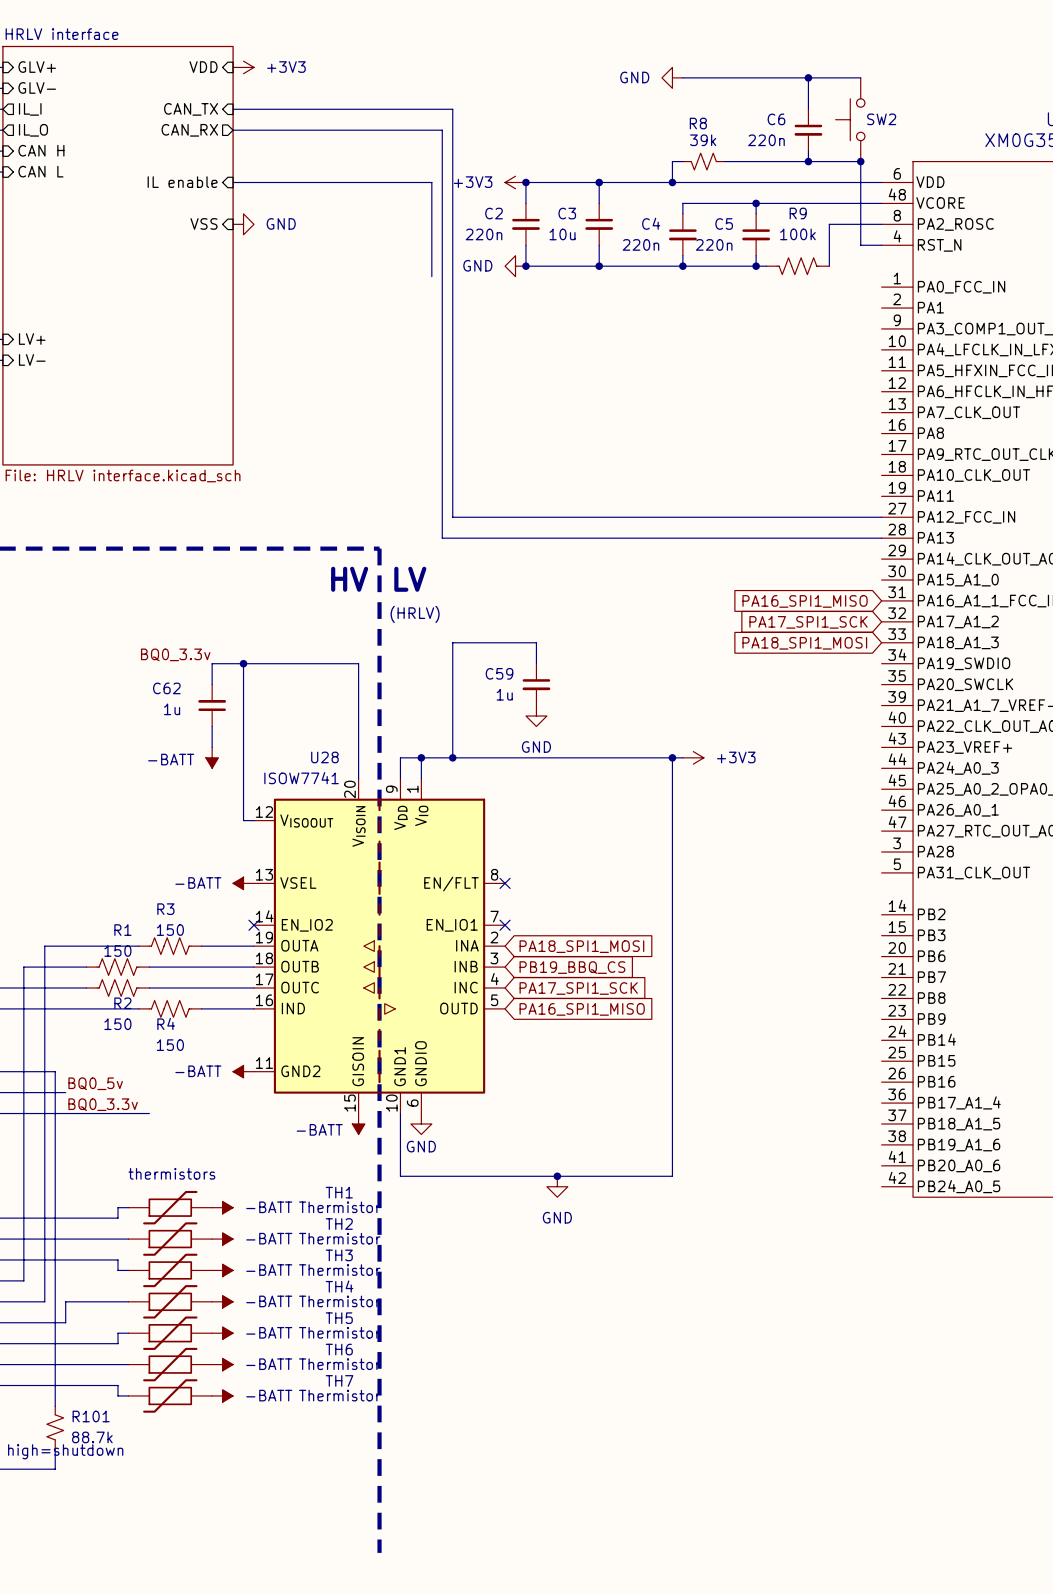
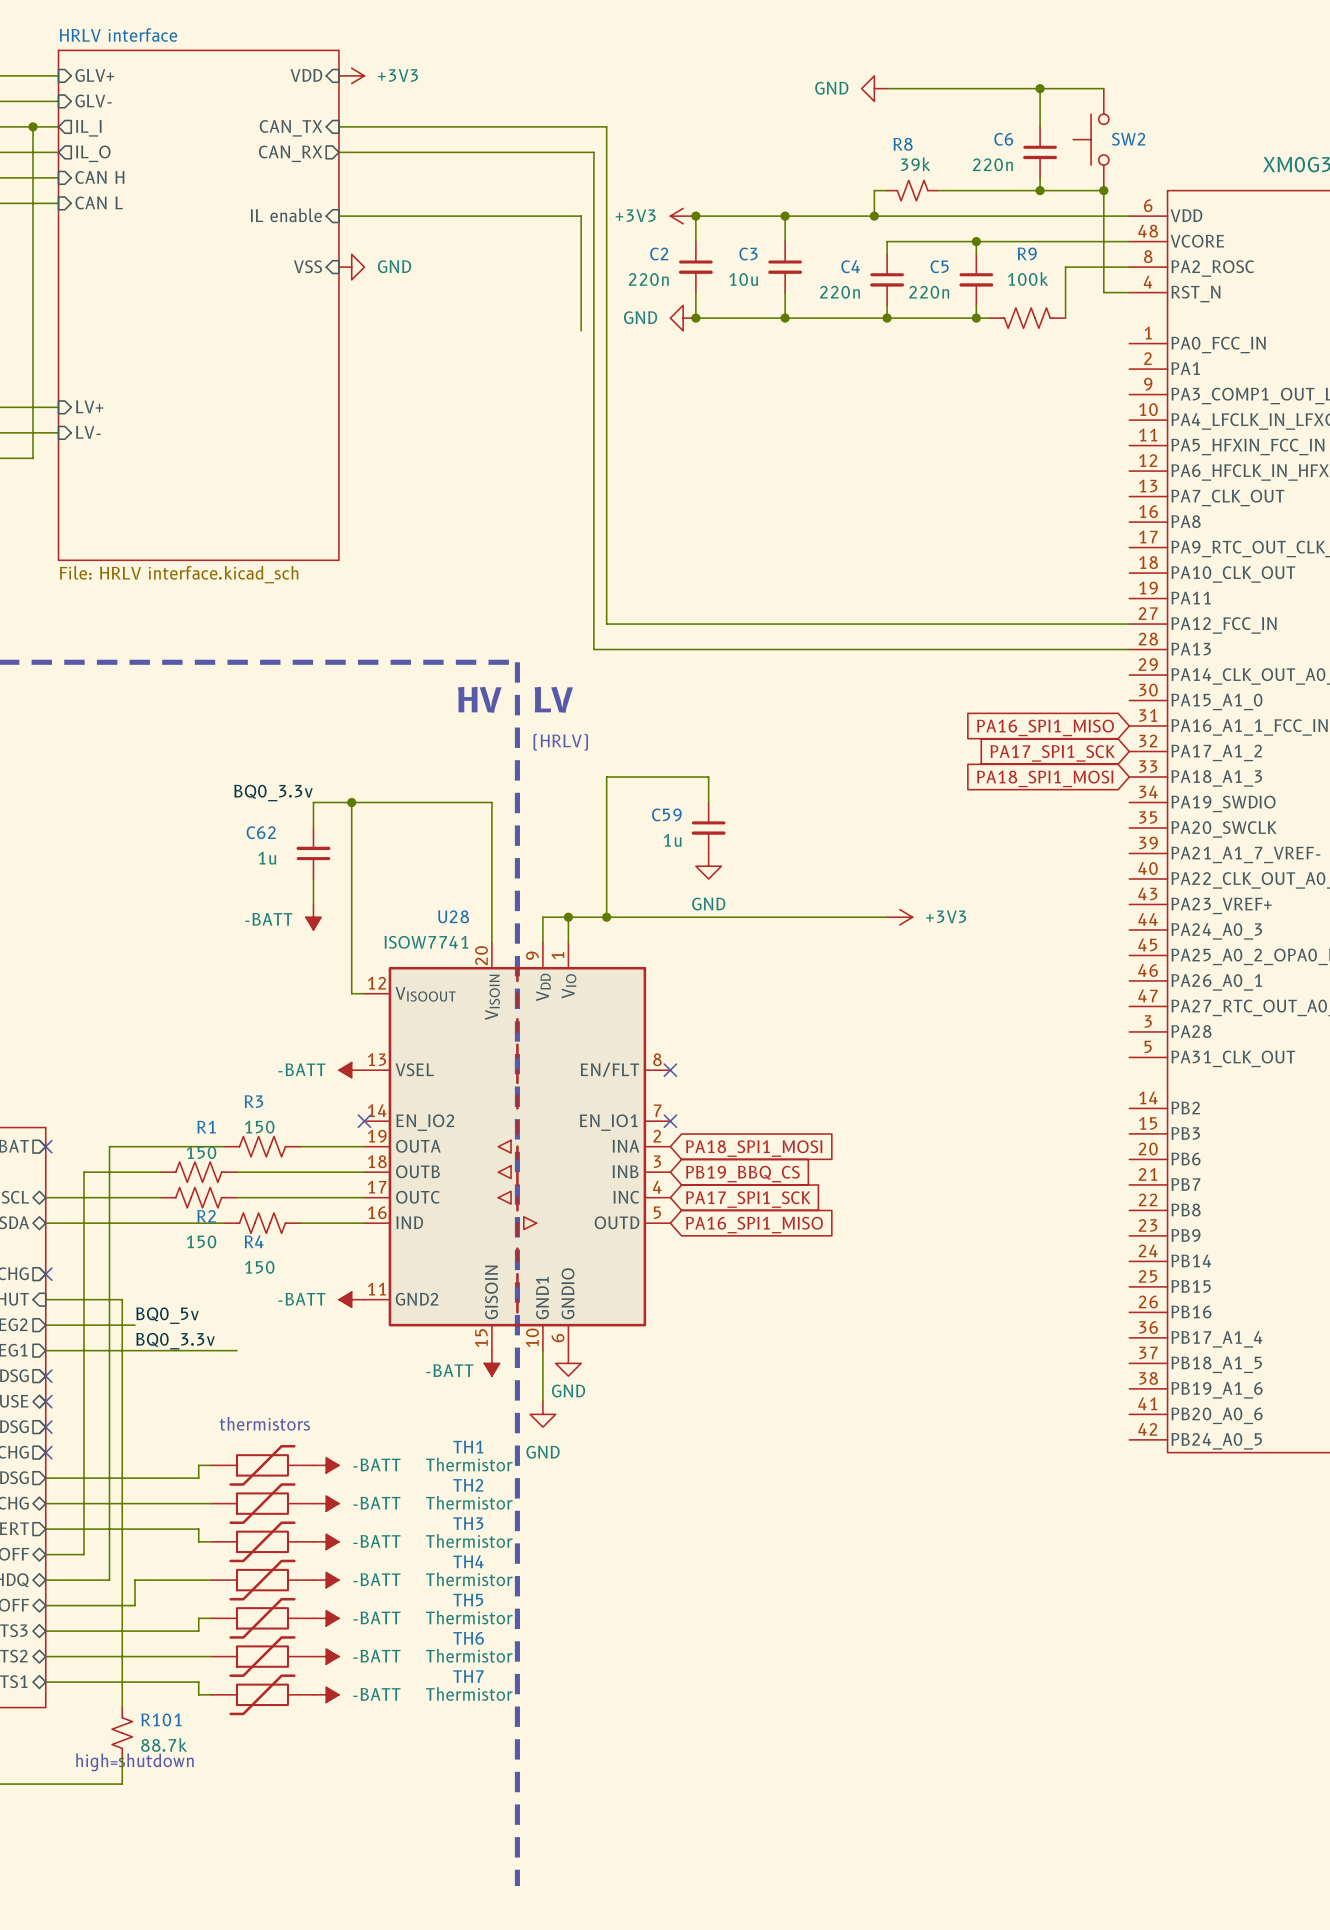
wire: (672, 757) (672, 1176) (400, 1176) (400, 1155) -> none
junction: (672, 757) -> none
junction: (557, 1176) -> none
power symbol position: GND (557, 1186) -> GND (542, 1414)

